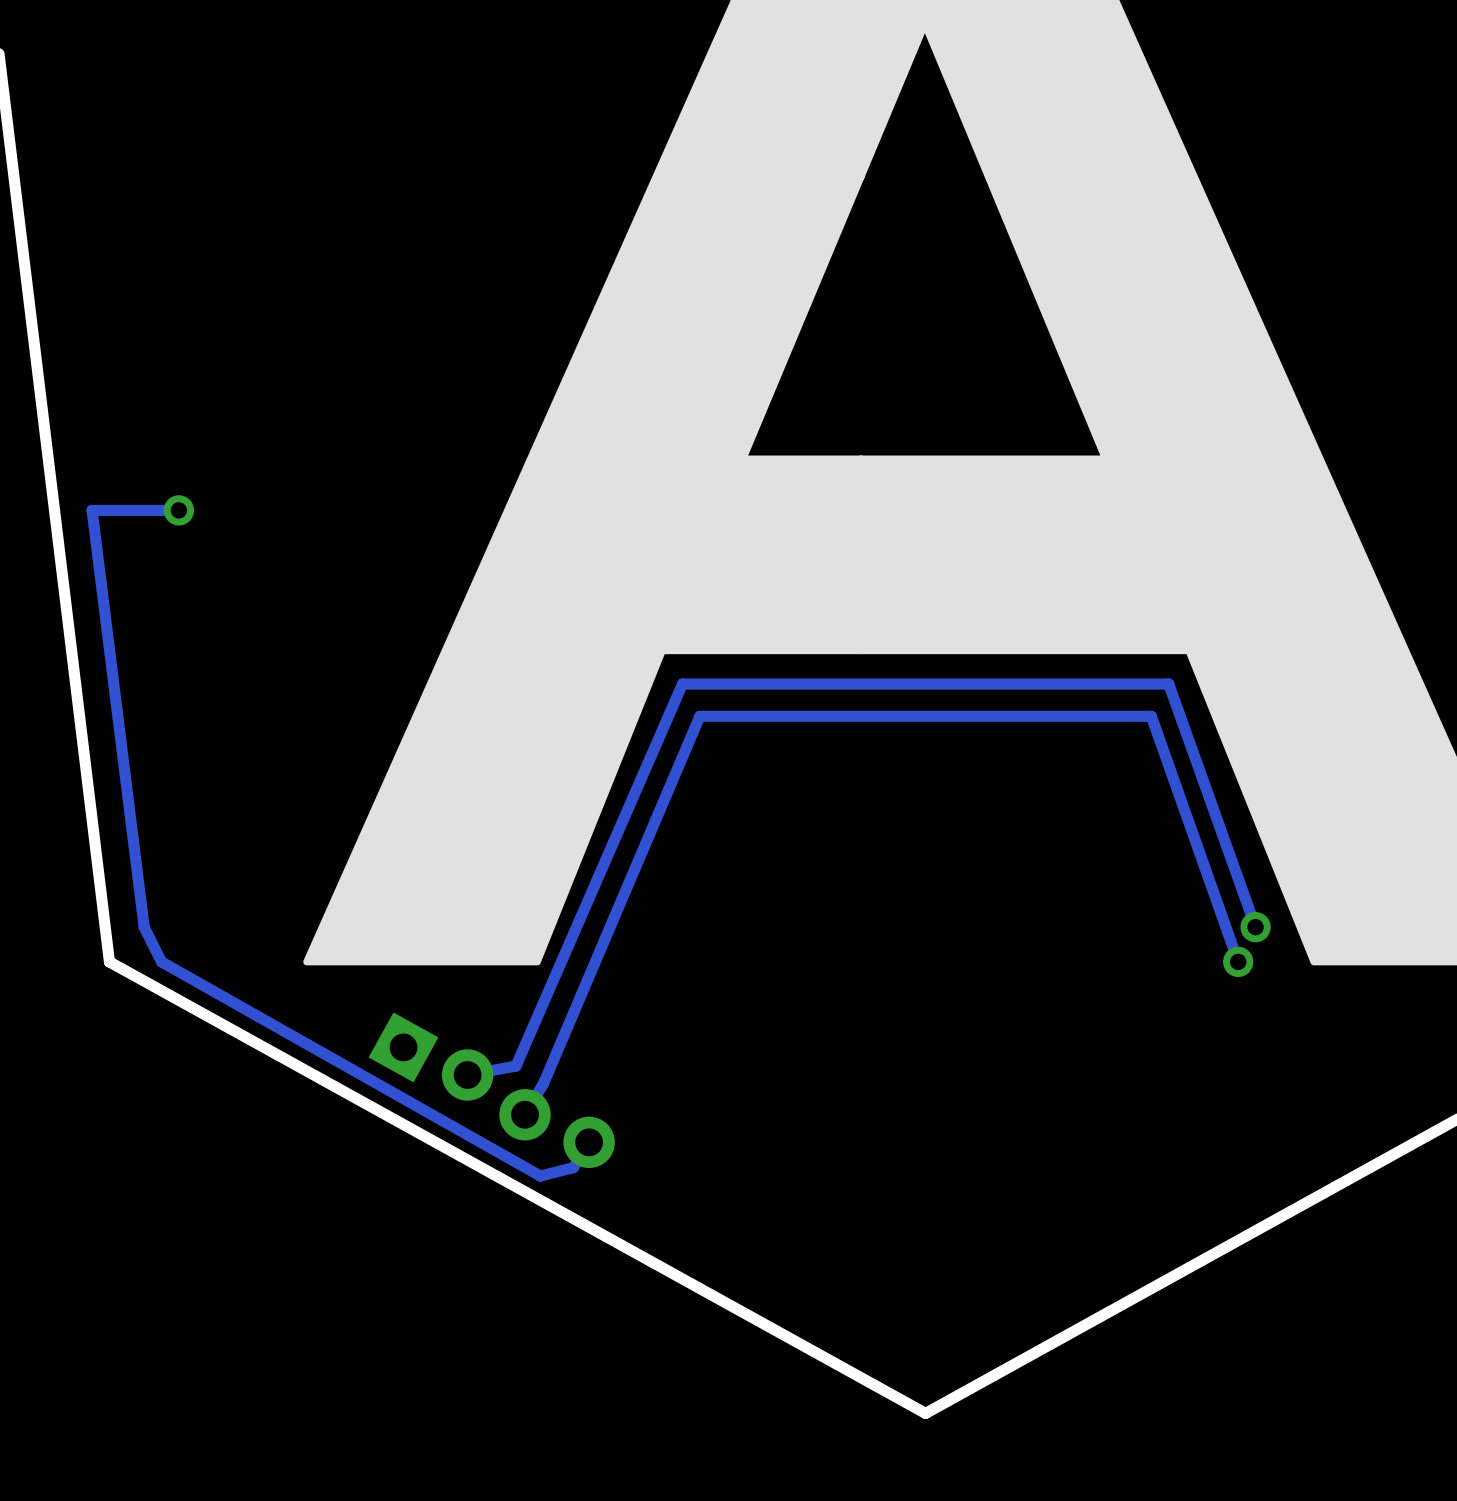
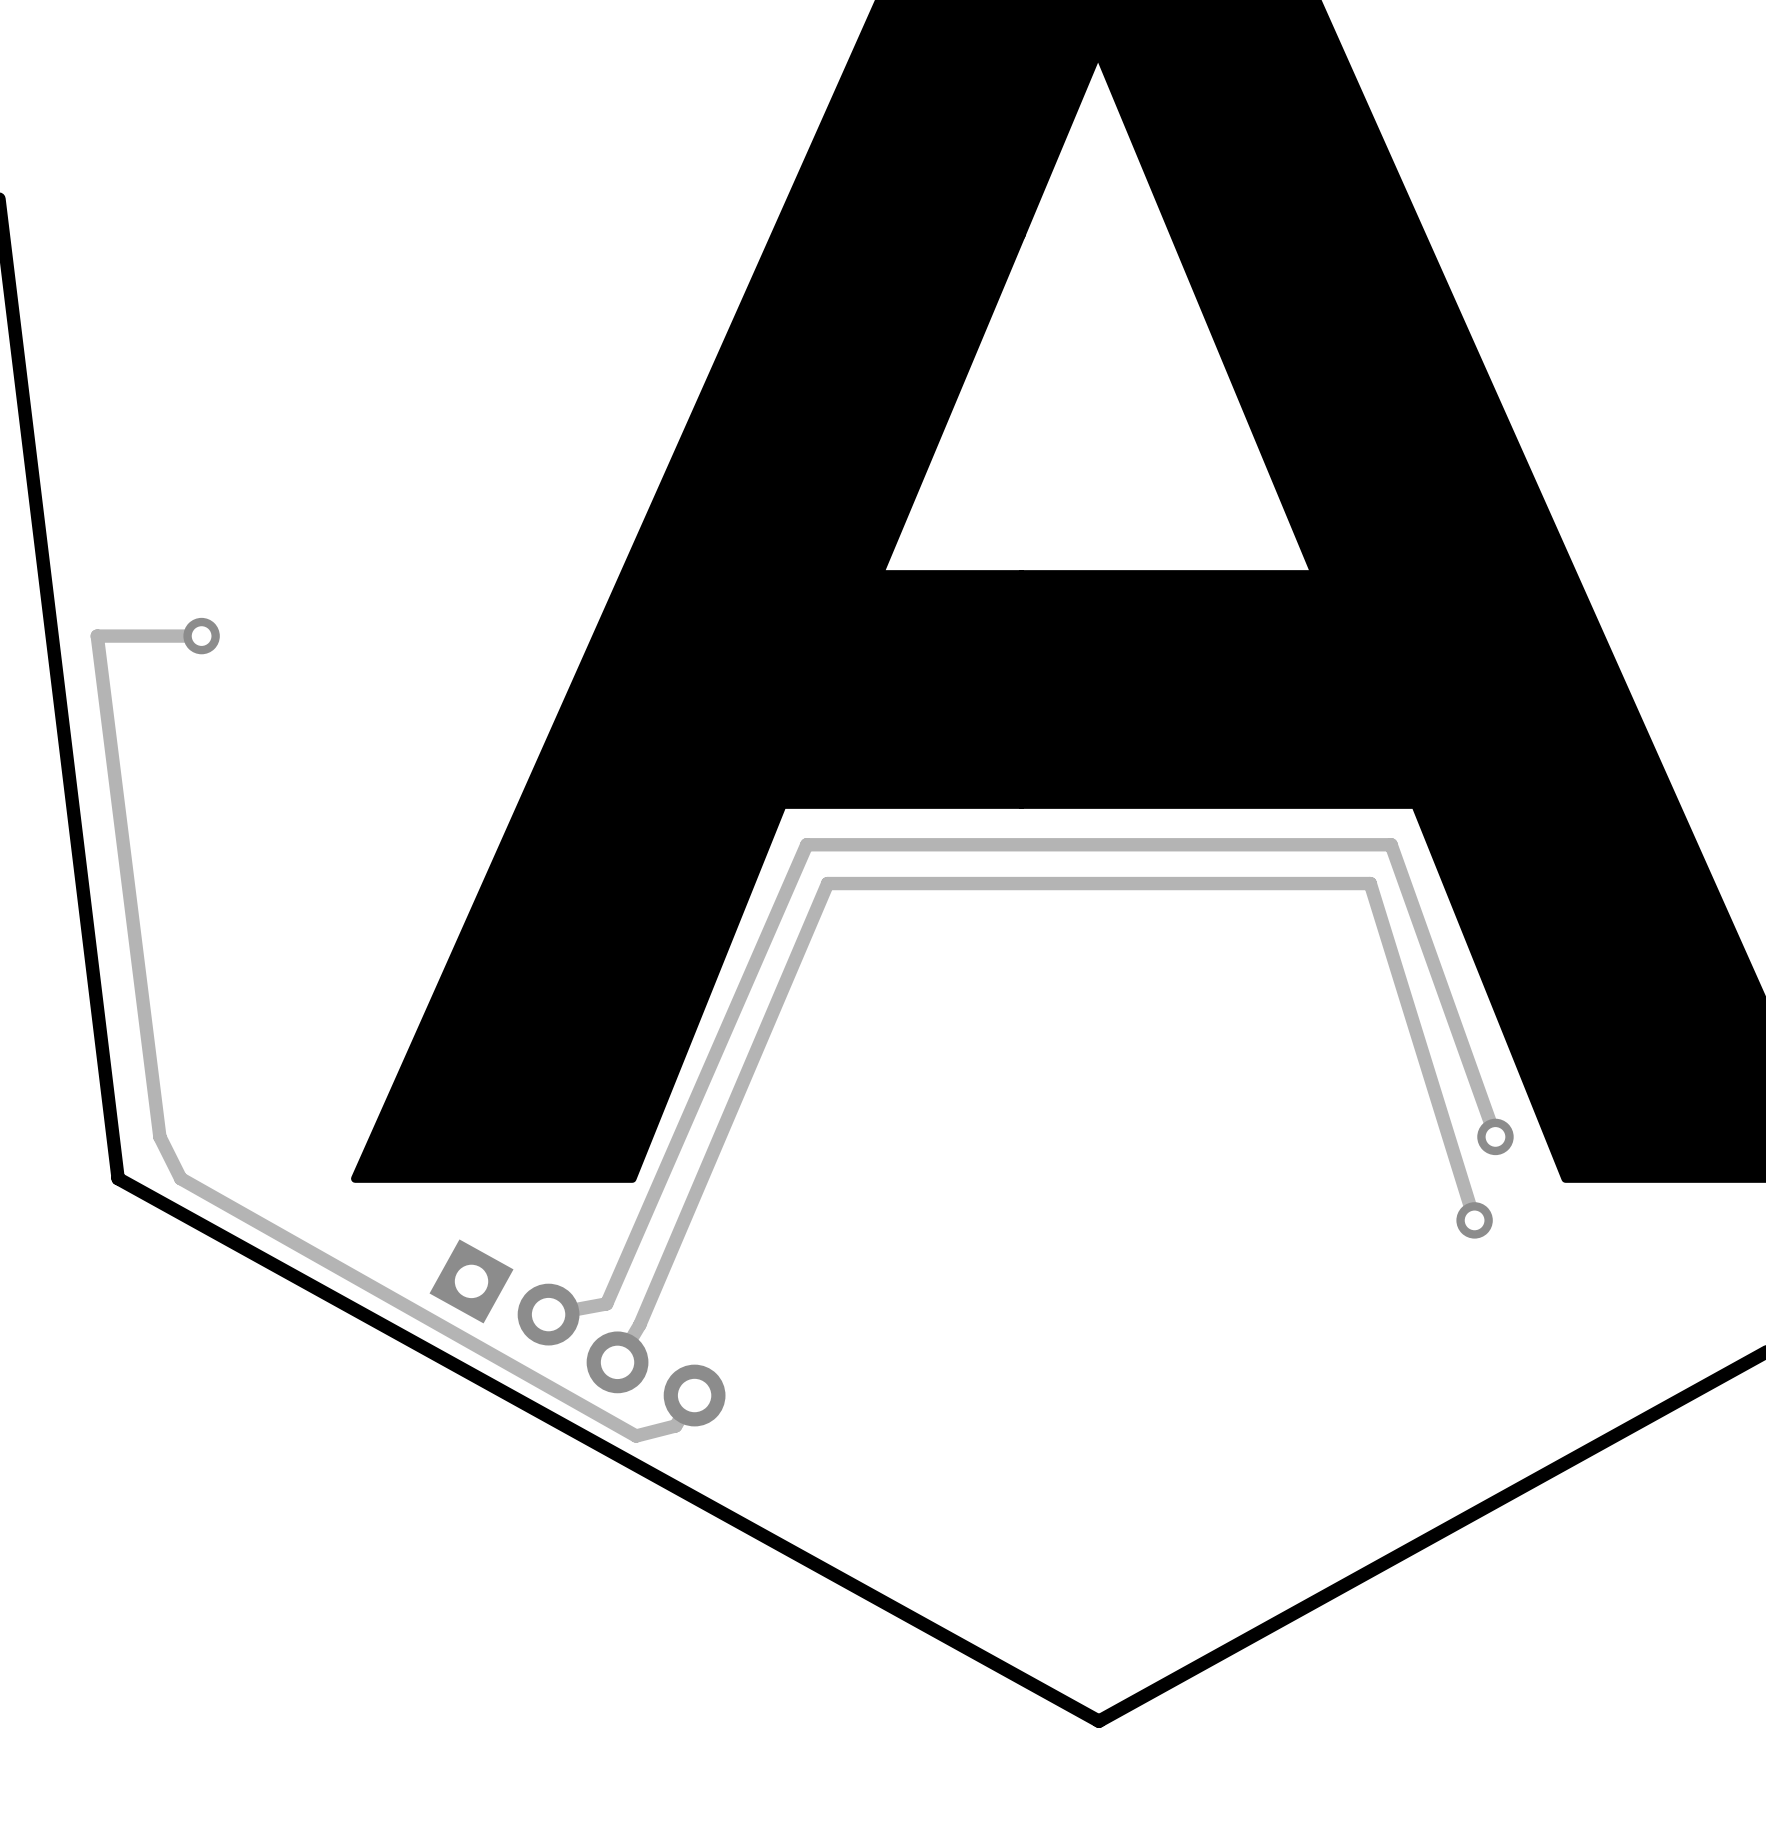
track: (1151, 716) (1238, 961) -> (1370, 883) (1474, 1220)
via position: (1238, 961) -> (1474, 1220)

